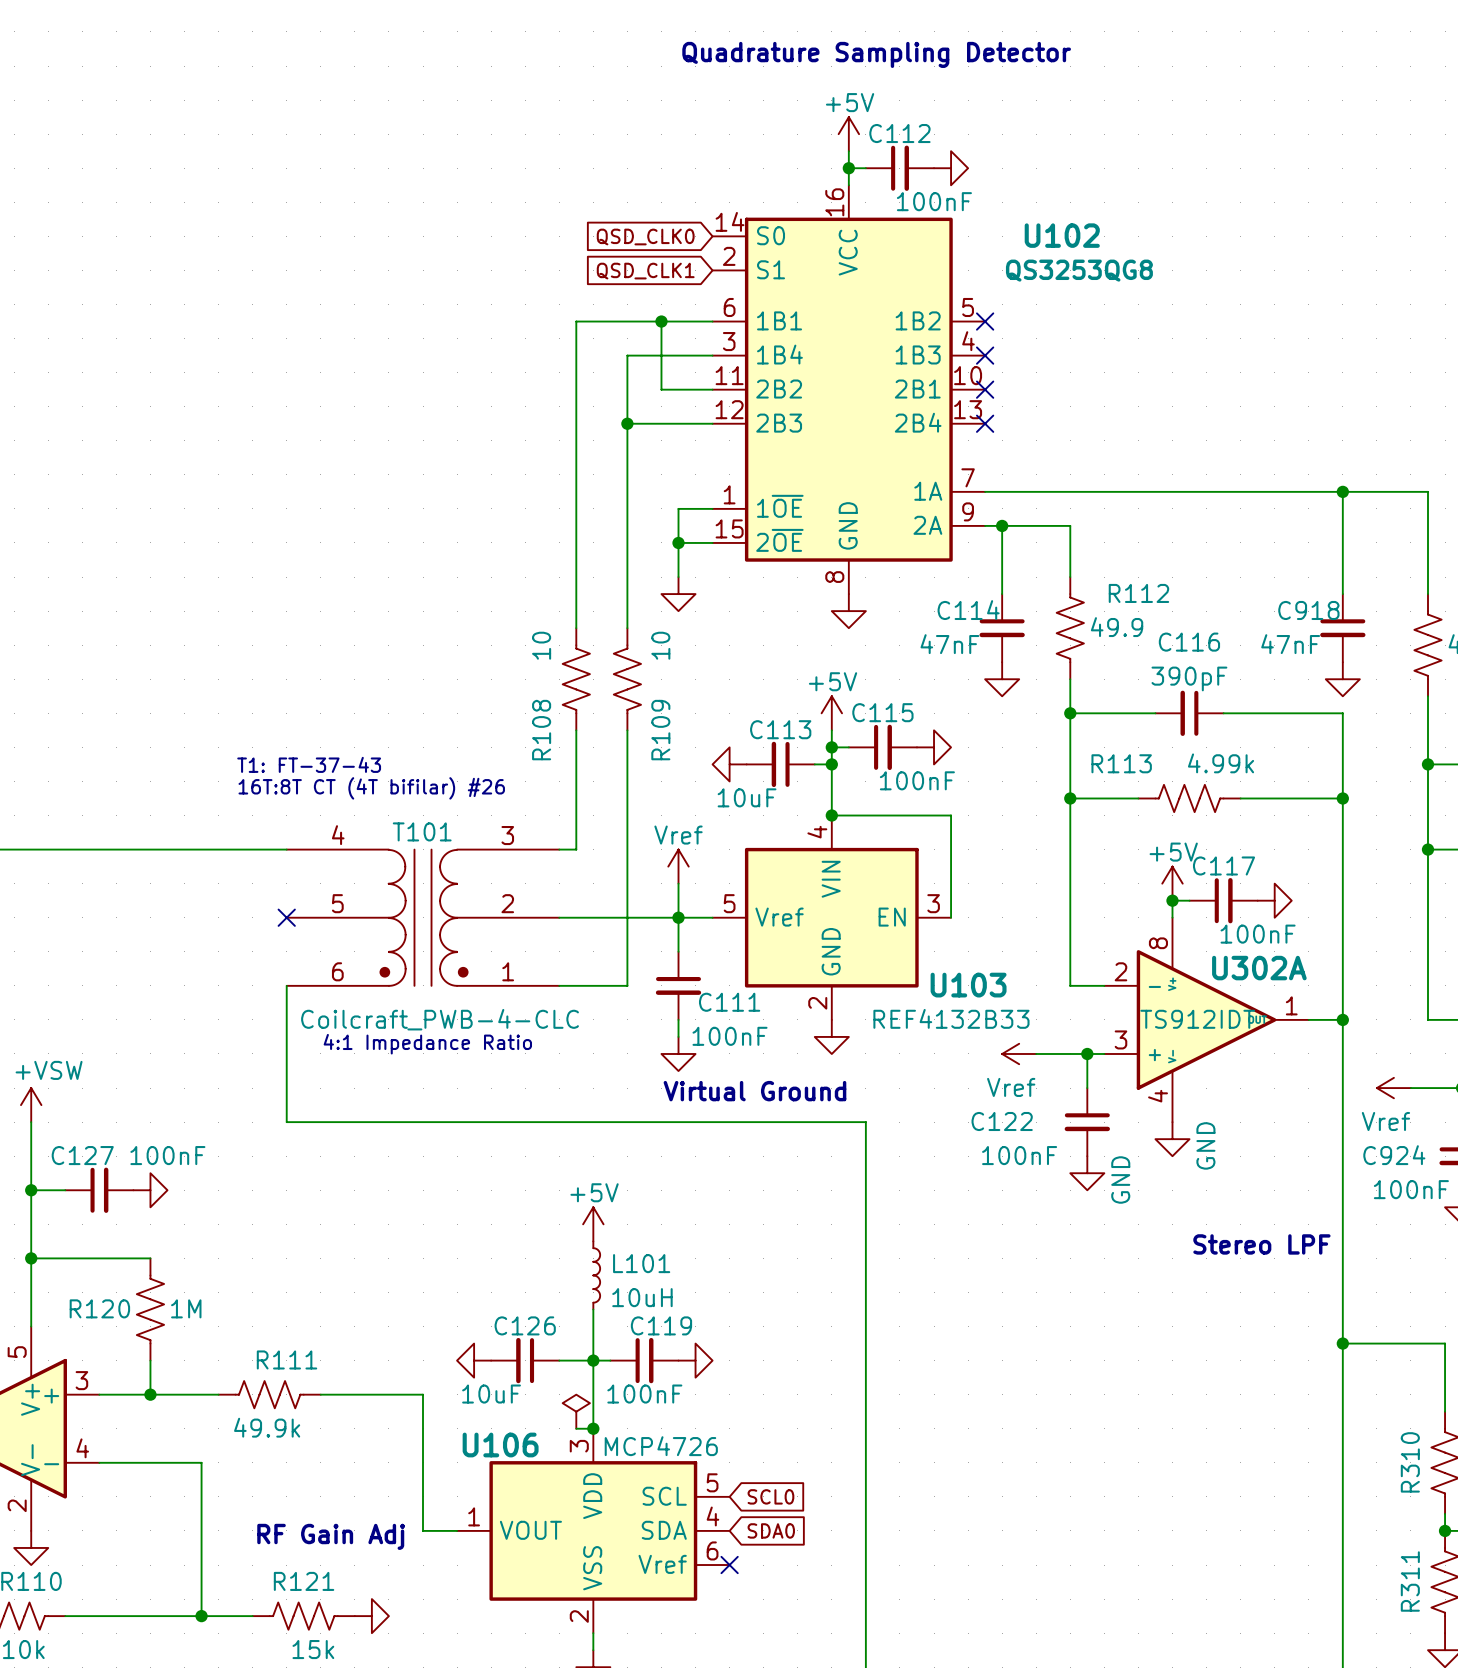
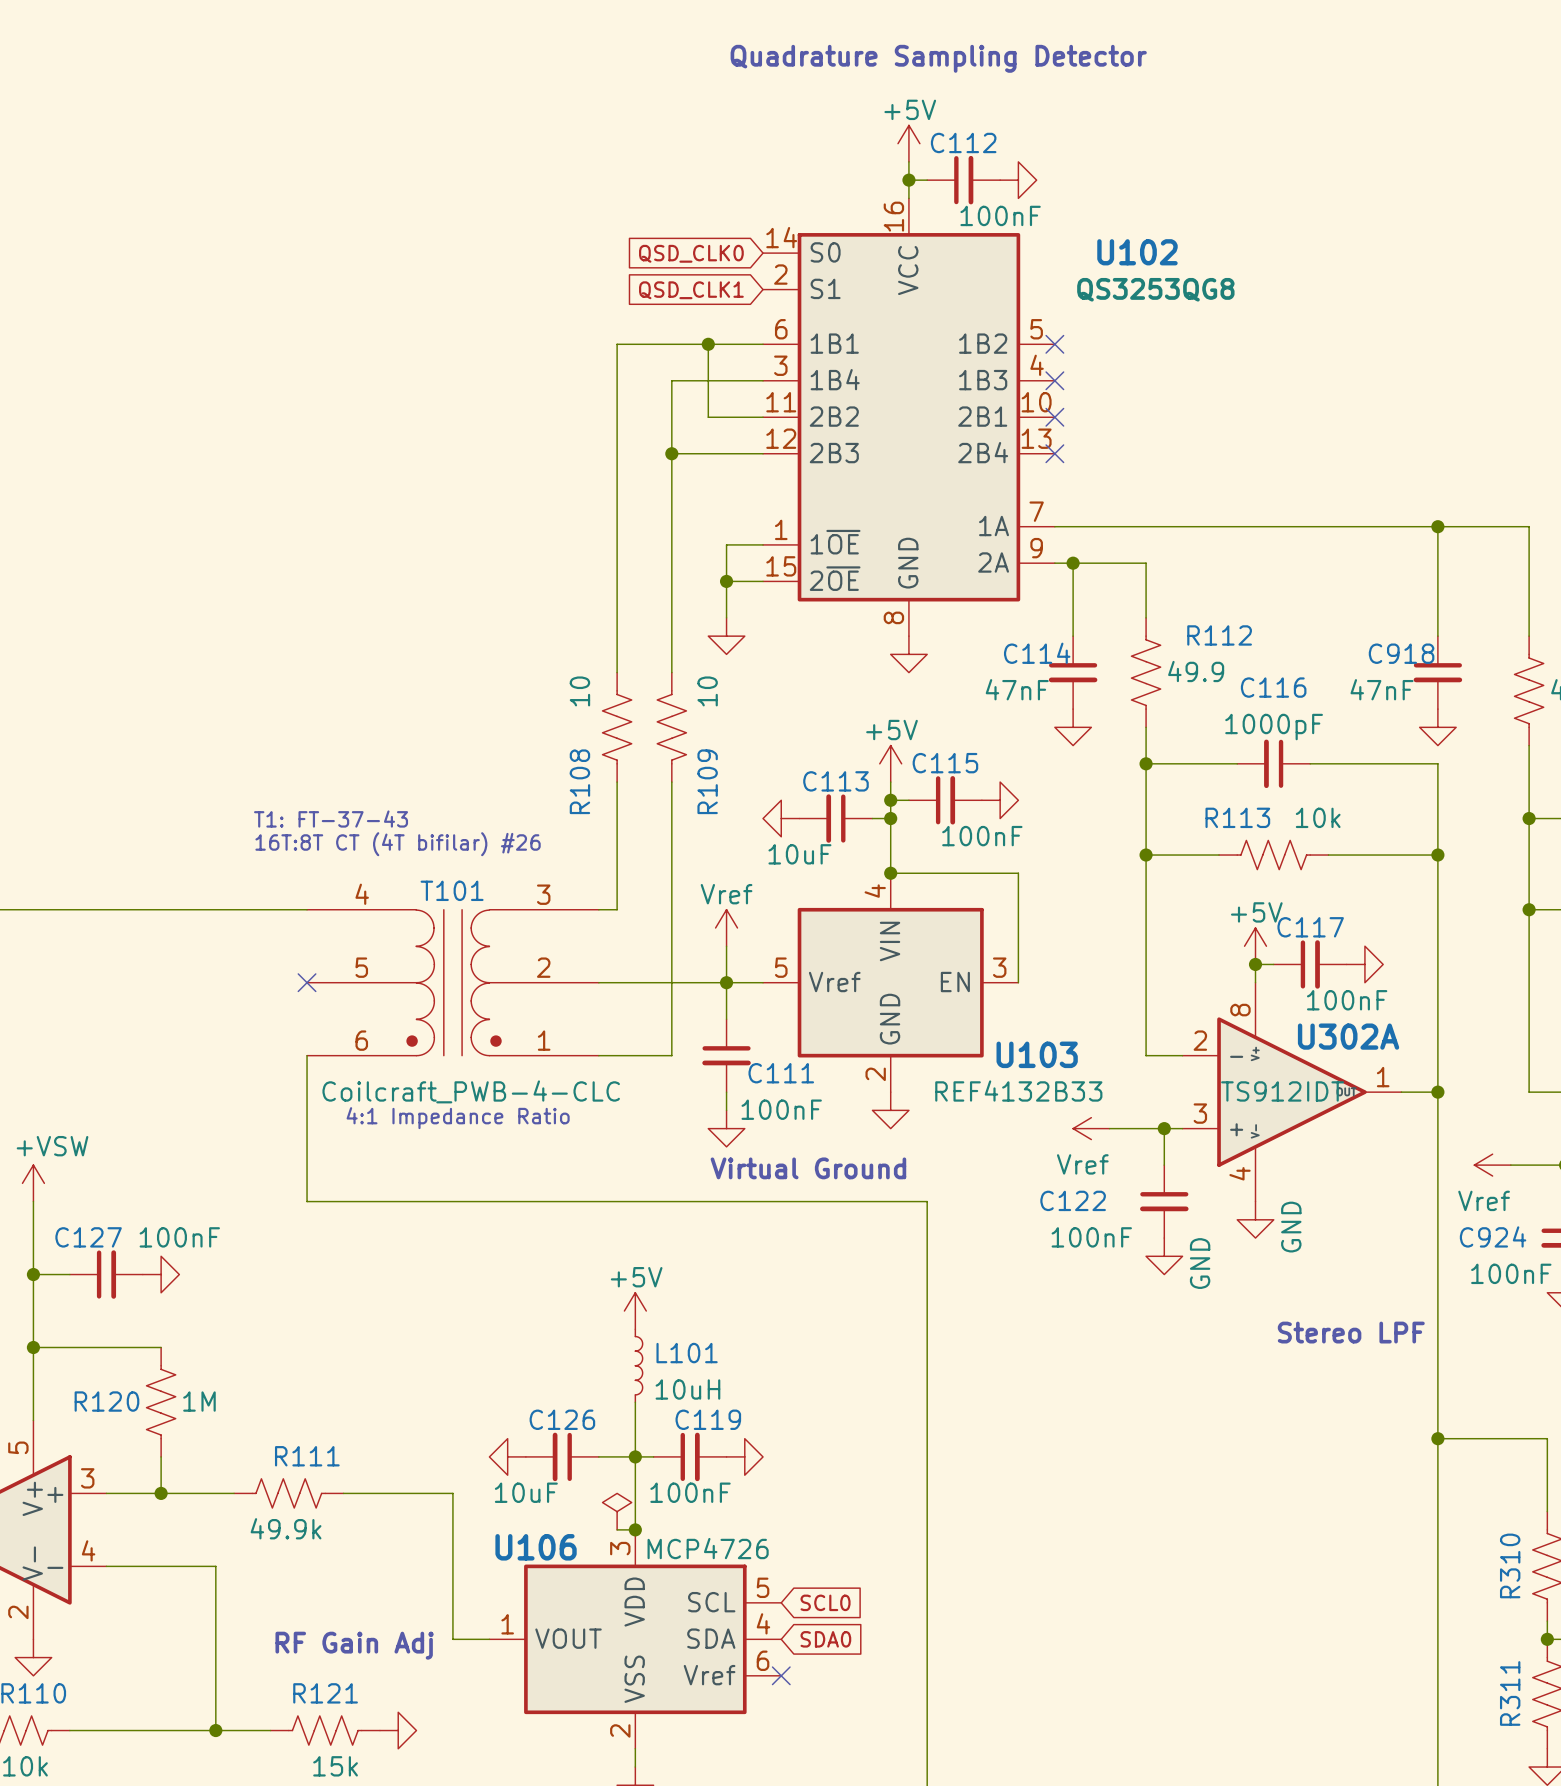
C116 value: 390pF (1189, 678) -> 1000pF (1274, 727)
R113 name position: R113 (1121, 763) -> R113 (1237, 817)
R113 value: 4.99k (1221, 763) -> 10k (1318, 817)

